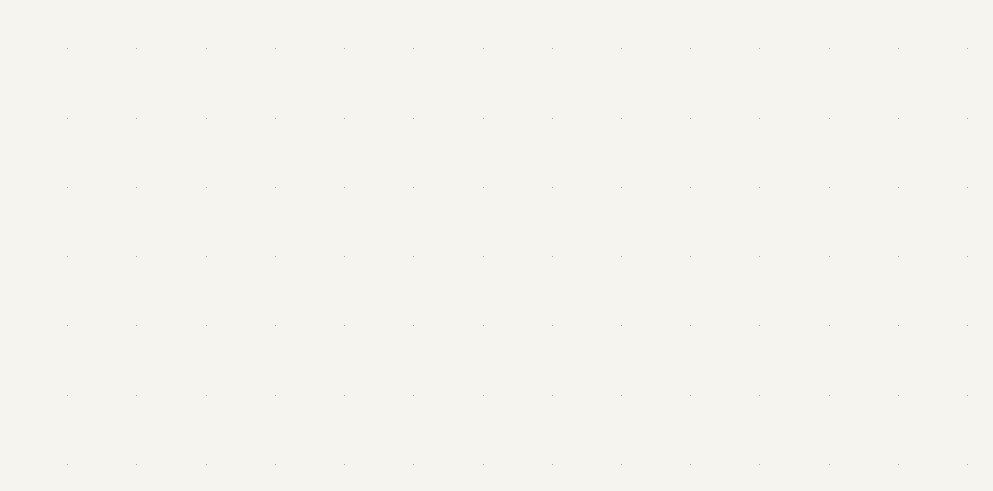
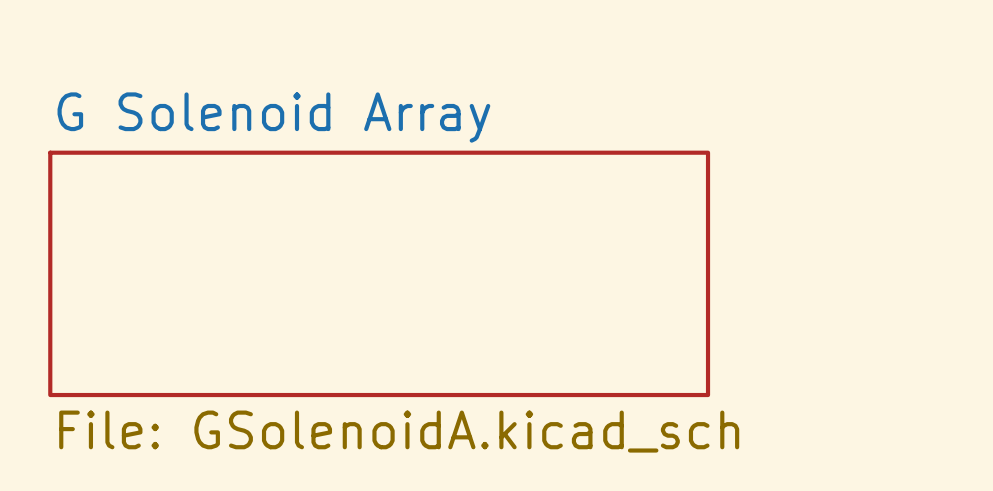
sheet G Solenoid Array: none -> File: GSolenoidA.kicad_sch (379, 273)

